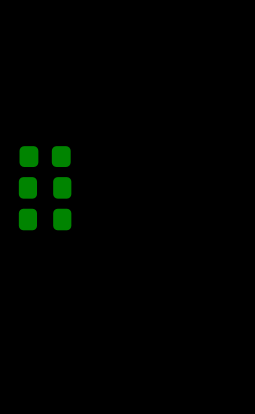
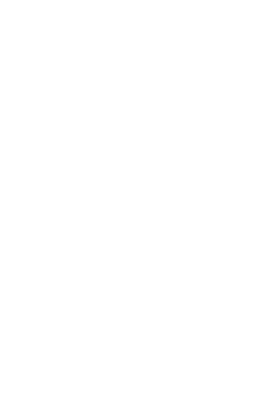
part: (45, 156) -> none
part: (45, 187) -> none
part: (45, 219) -> none

